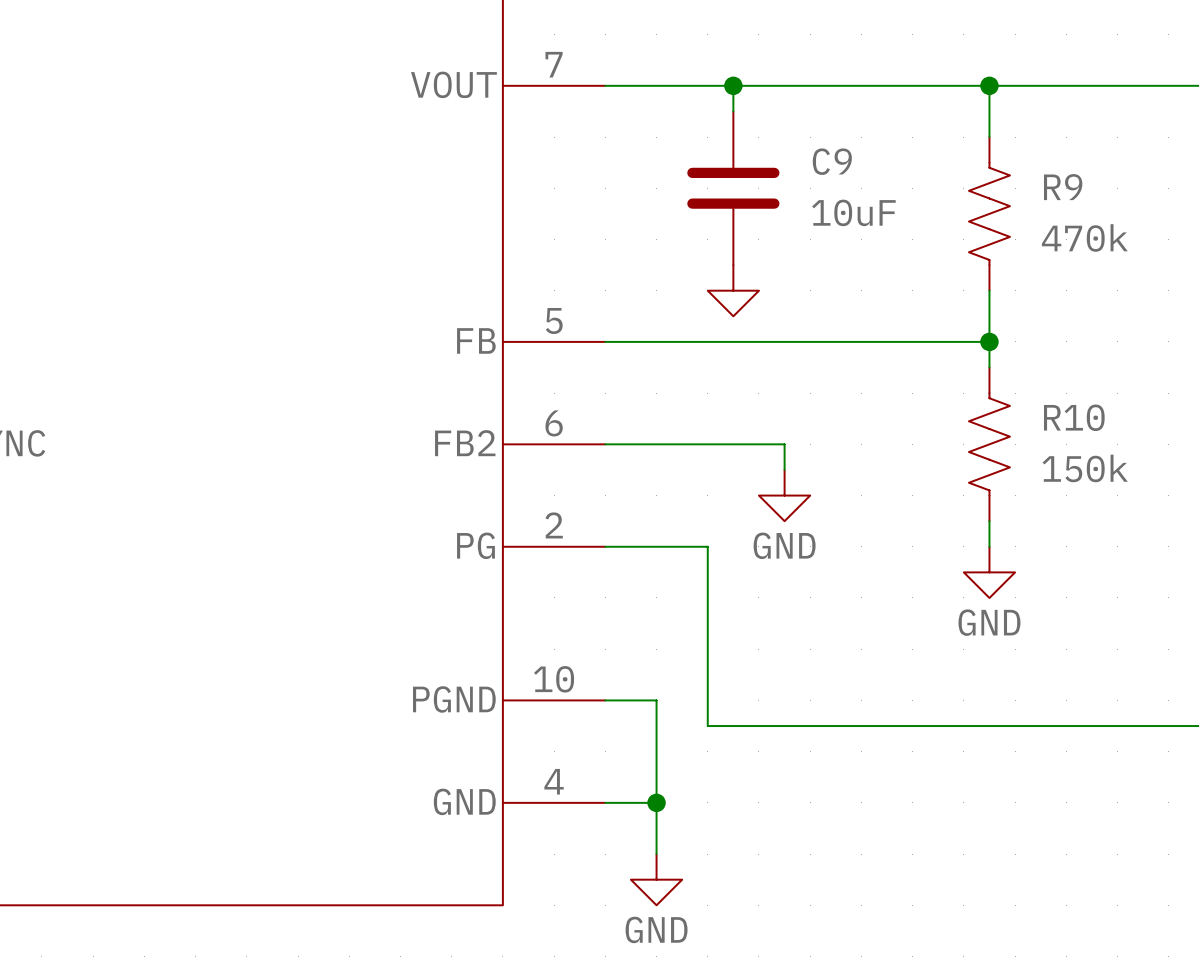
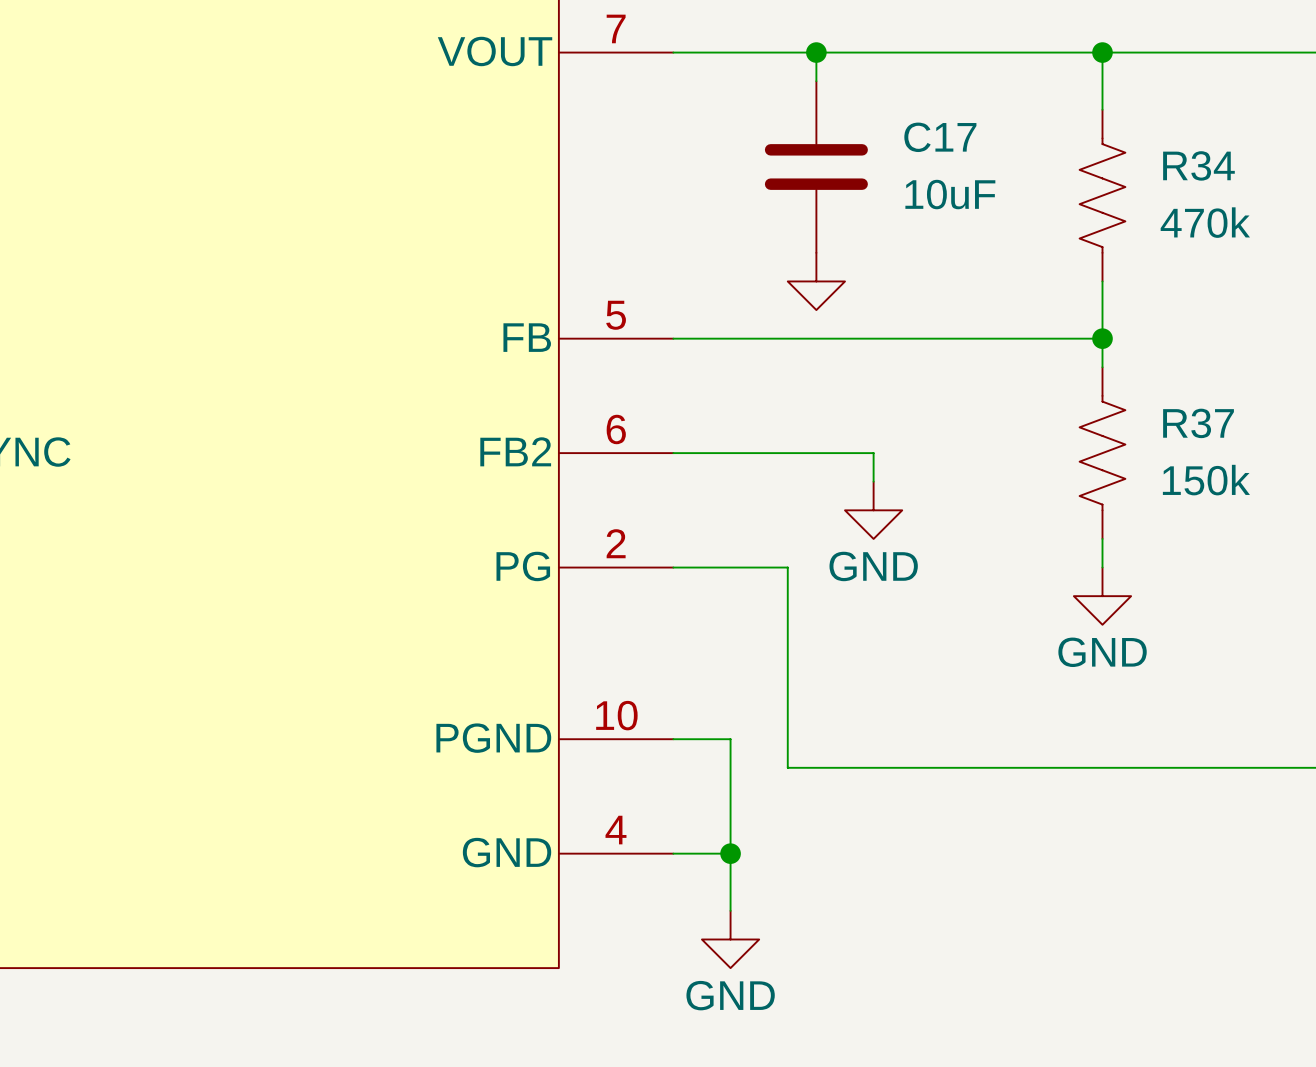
C9 name: C9 (832, 161) -> C17 (940, 137)
R9 name: R9 (1063, 187) -> R34 (1198, 165)
R10 name: R10 (1074, 417) -> R37 (1198, 423)

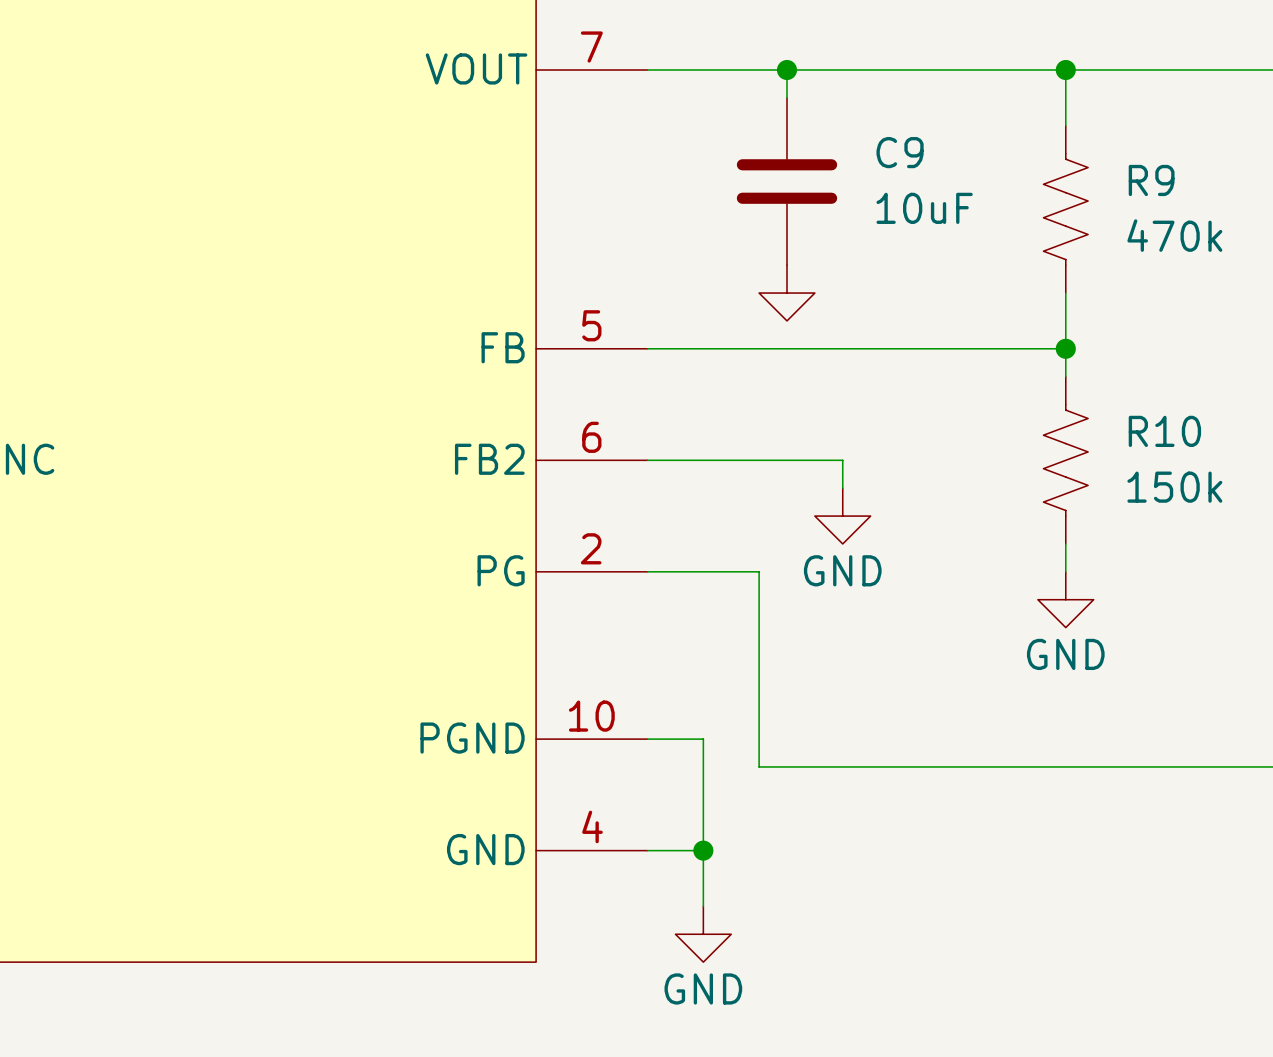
C17 name: C17 (940, 137) -> C9 (900, 152)
R34 name: R34 (1198, 165) -> R9 (1151, 180)
R37 name: R37 (1198, 423) -> R10 (1164, 431)

